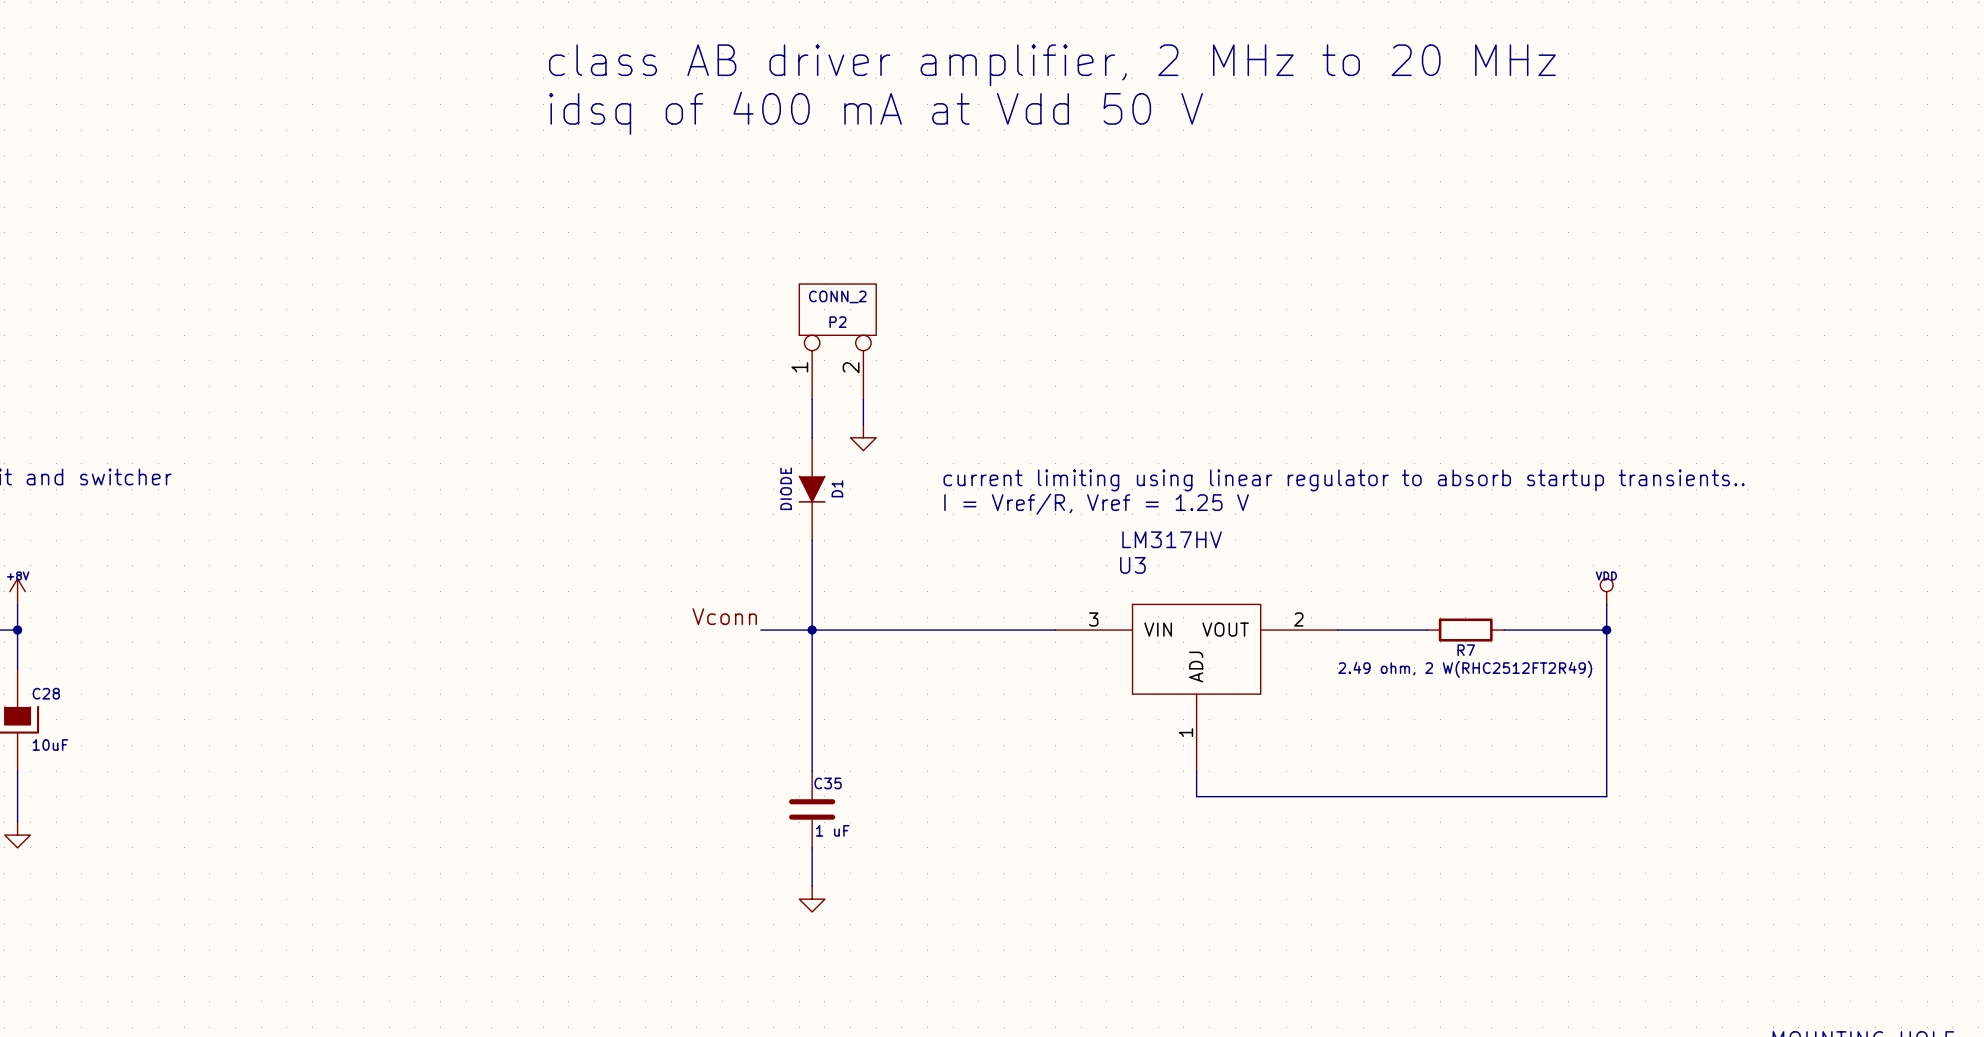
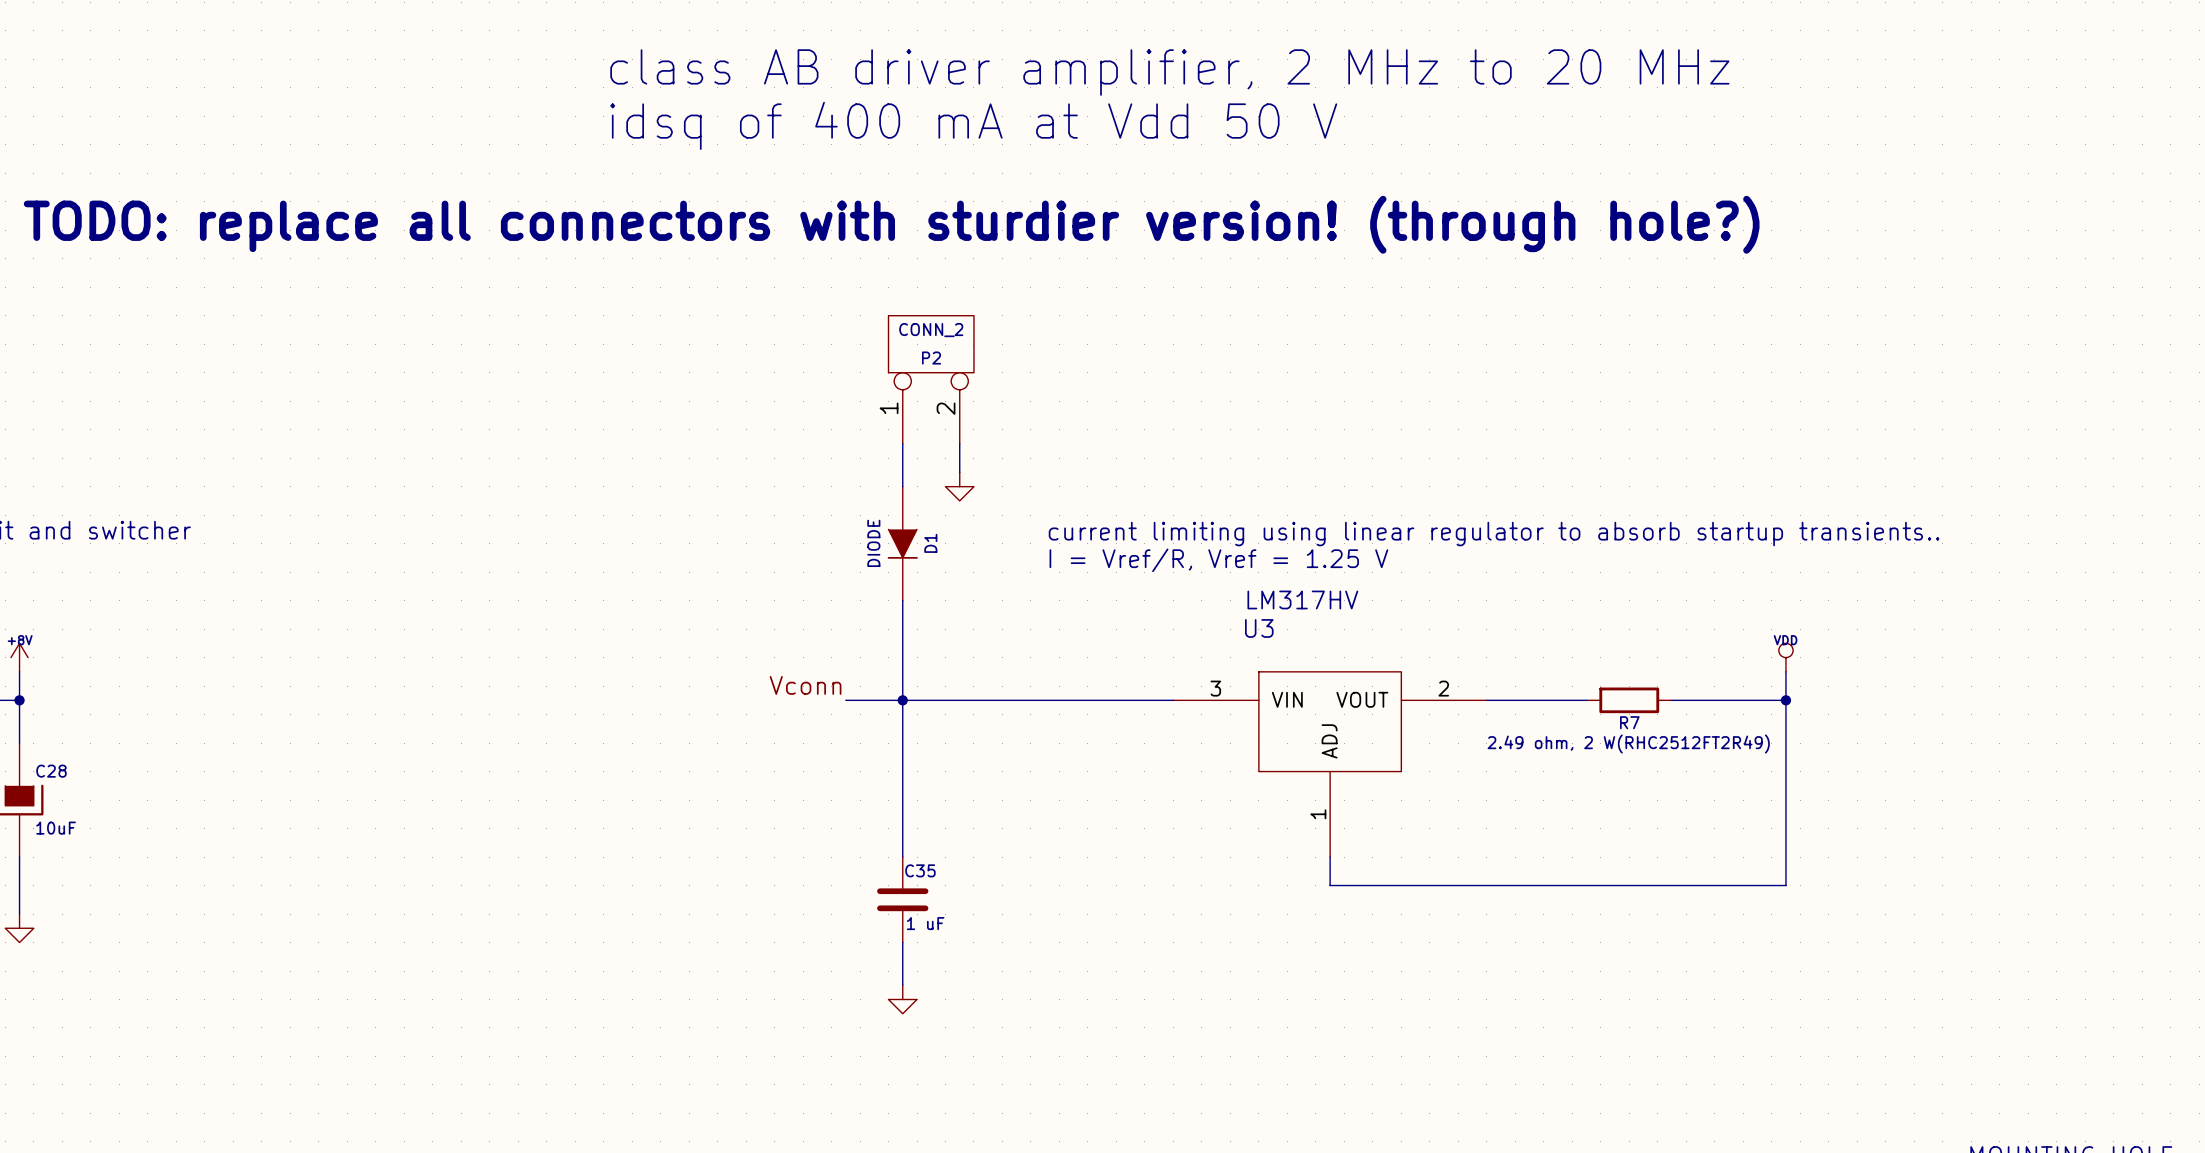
text: none -> TODO: replace all connectors with sturdier version! (through hole?) (891, 224)

